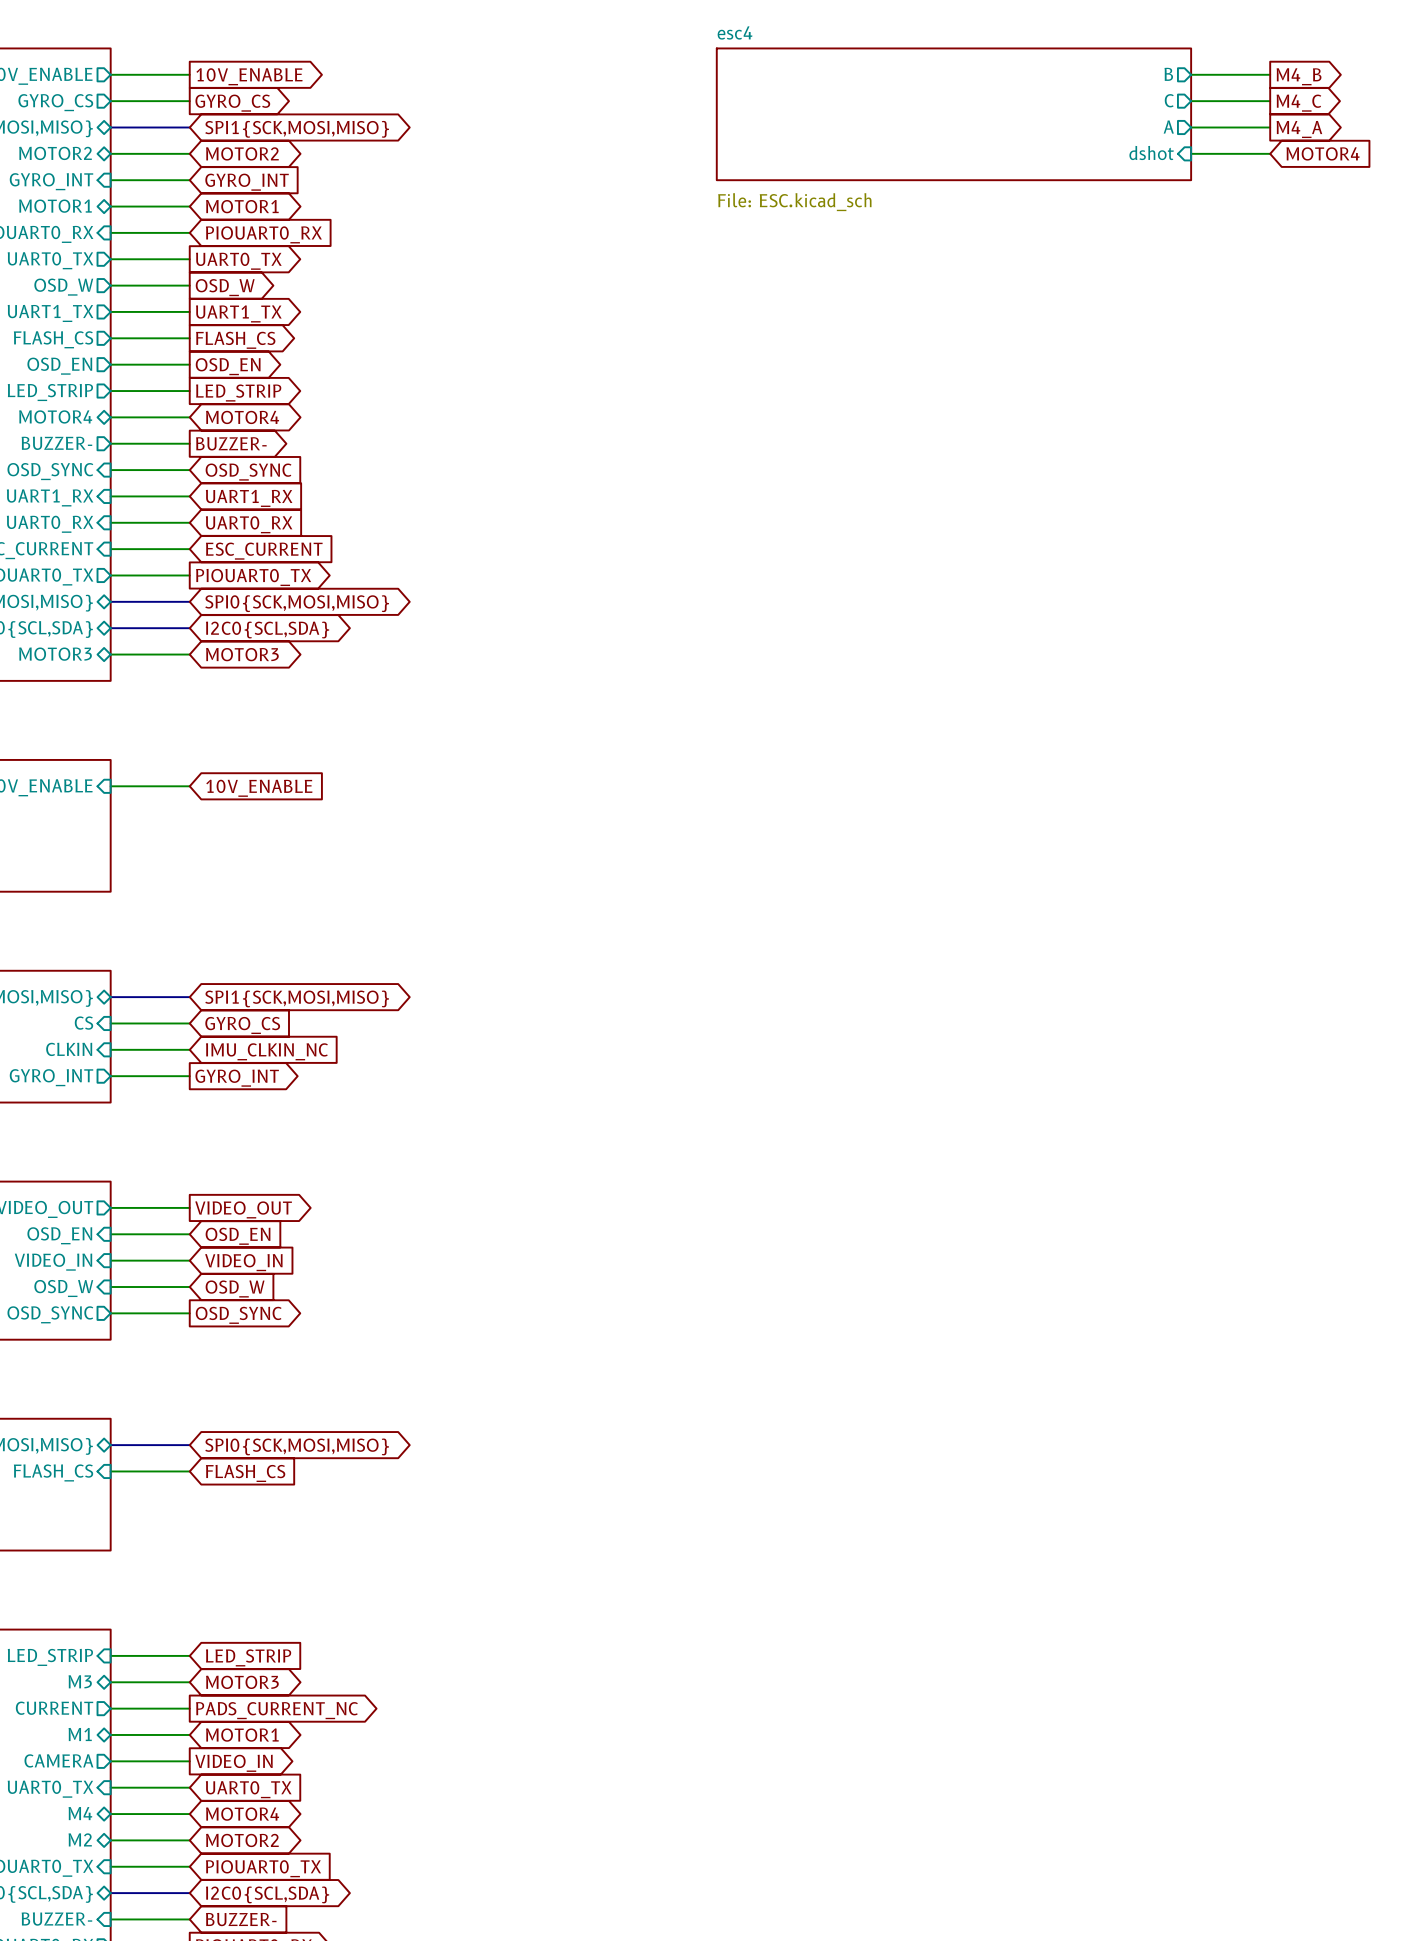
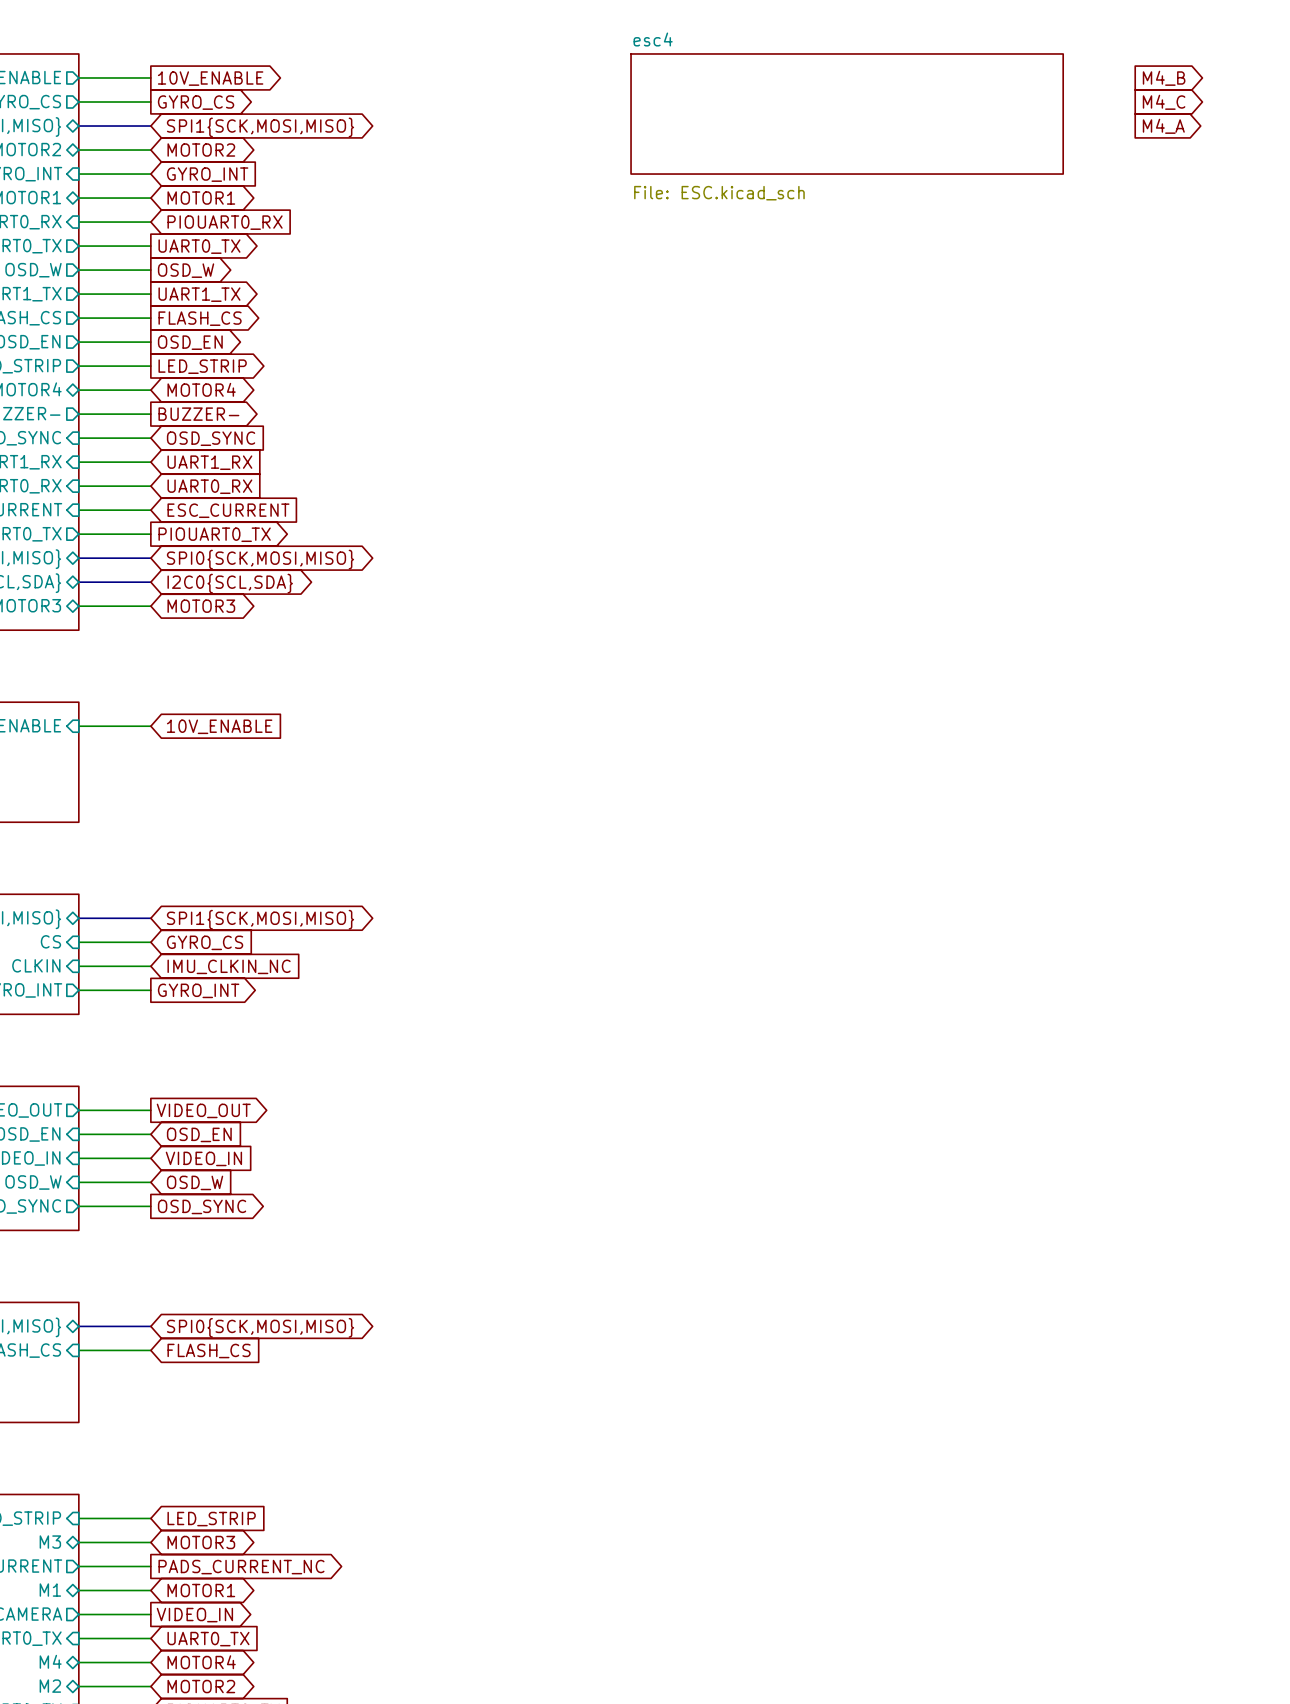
sheet pin: B (1168, 74) -> none
wire: (1191, 74) (1270, 74) -> none
sheet pin: C (1169, 100) -> none
wire: (1191, 101) (1270, 101) -> none
sheet pin: A (1168, 127) -> none
wire: (1191, 127) (1270, 127) -> none
sheet pin: dshot (1151, 153) -> none
wire: (1191, 153) (1270, 153) -> none
global label: MOTOR4 (1323, 153) -> none

